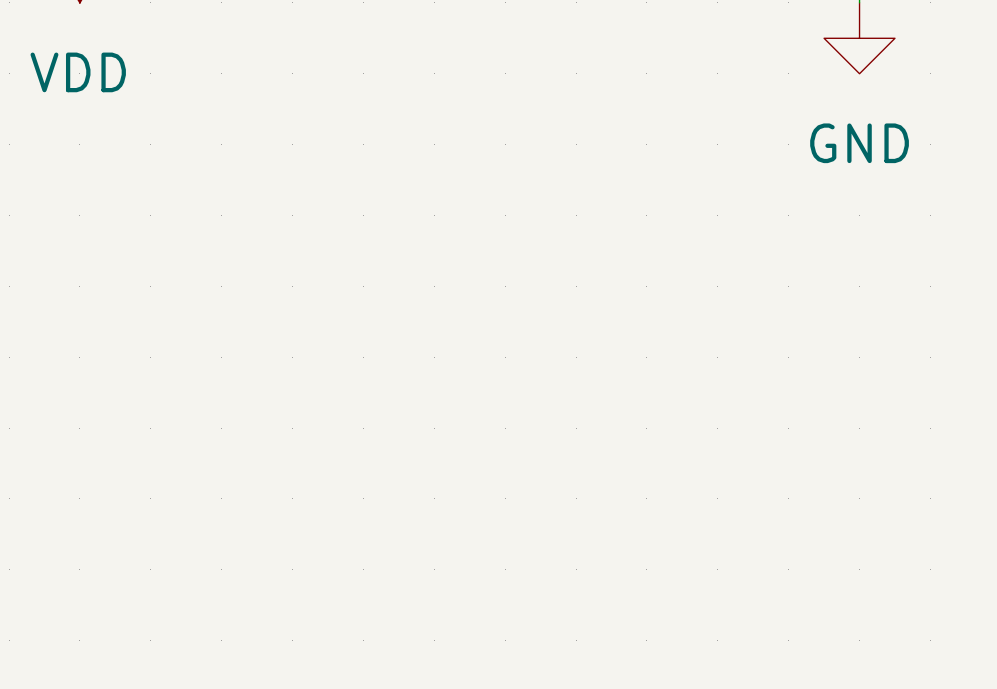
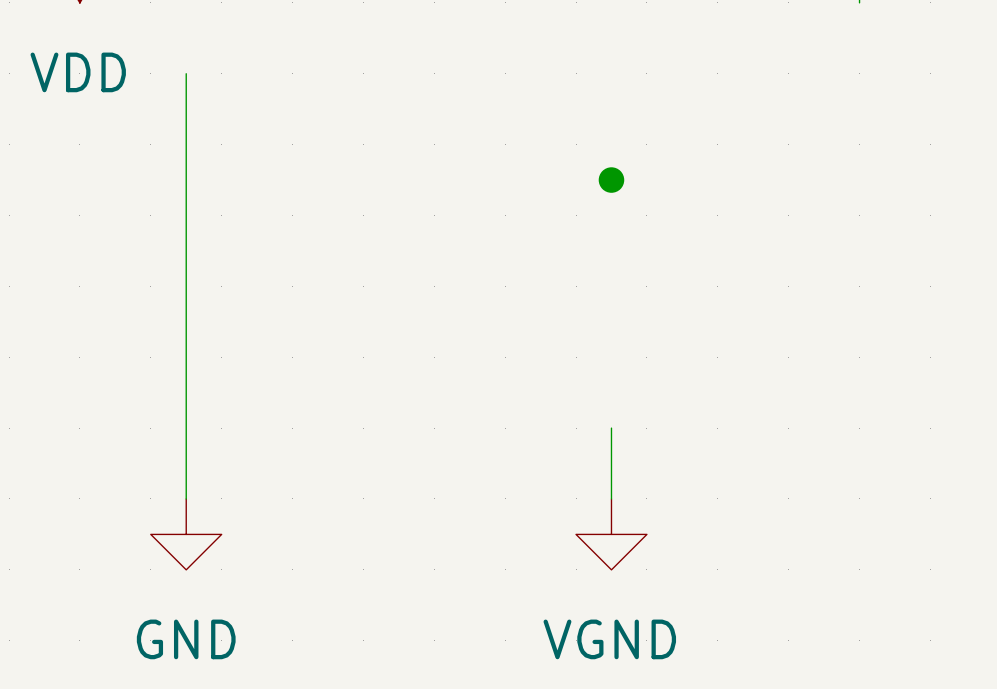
power symbol: GND (859, 38) -> none
wire: none -> (186, 73) (186, 498)
junction: none -> (611, 180)
wire: none -> (611, 428) (611, 498)
power symbol: none -> GND (186, 534)
power symbol: none -> VGND (611, 534)

